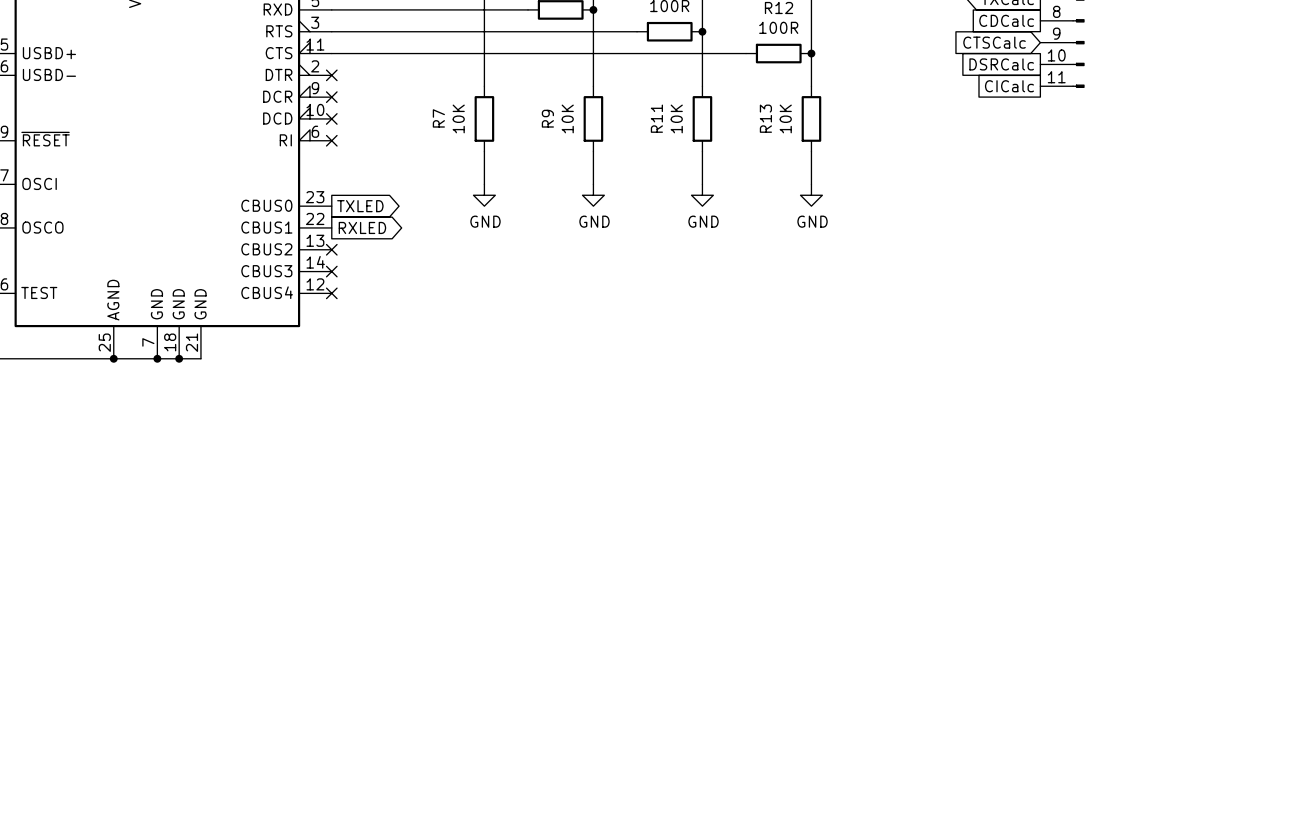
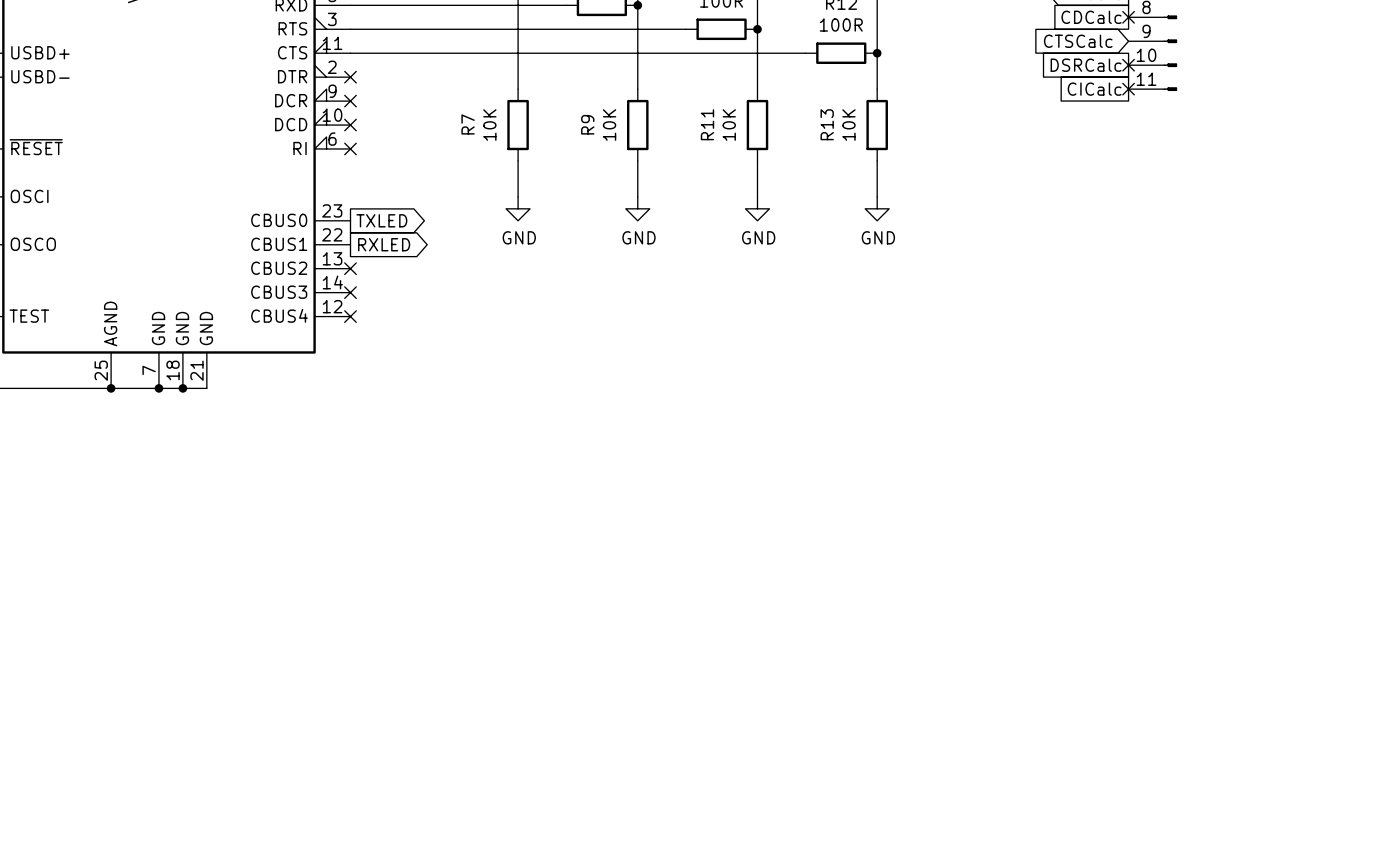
no-connect mark: none -> (1128, 17)
no-connect mark: none -> (1128, 65)
no-connect mark: none -> (1128, 89)

